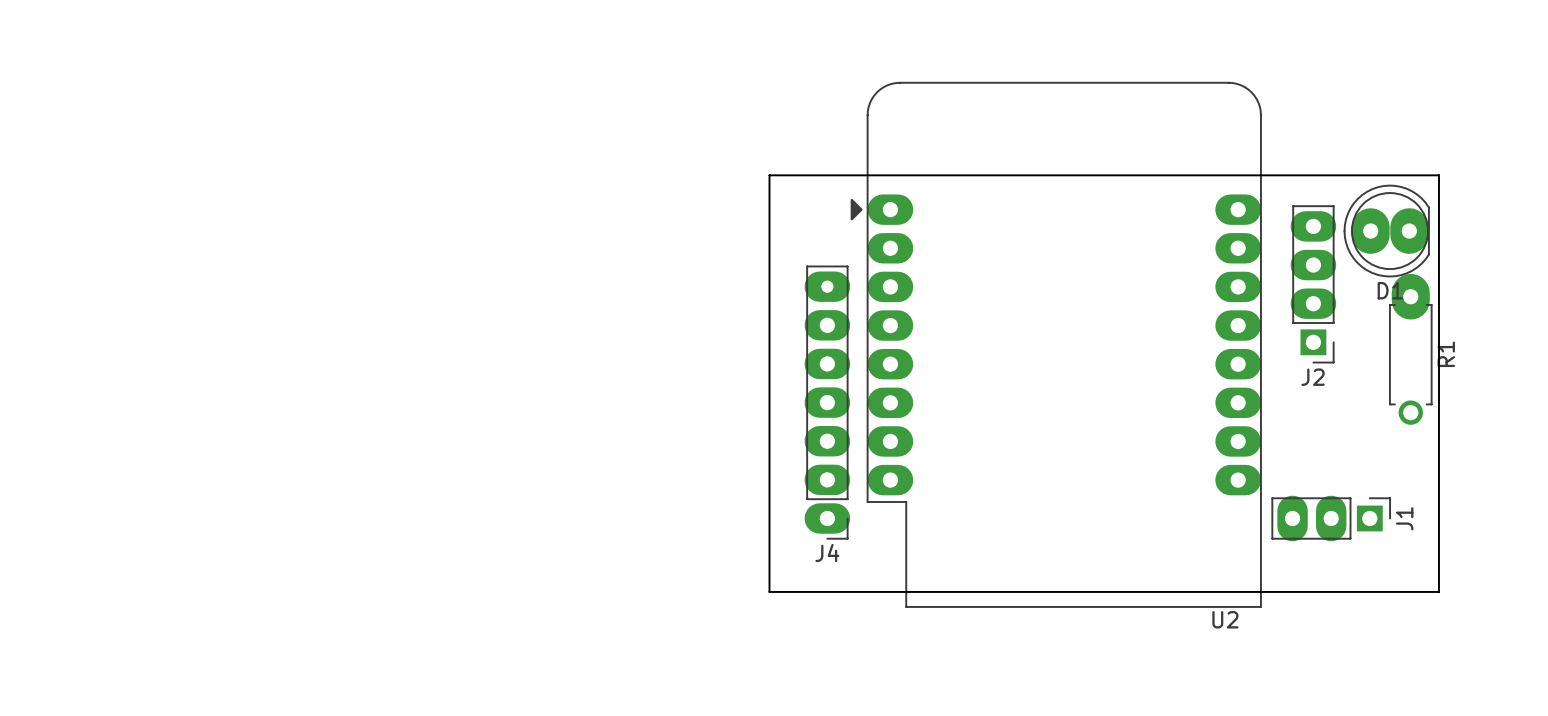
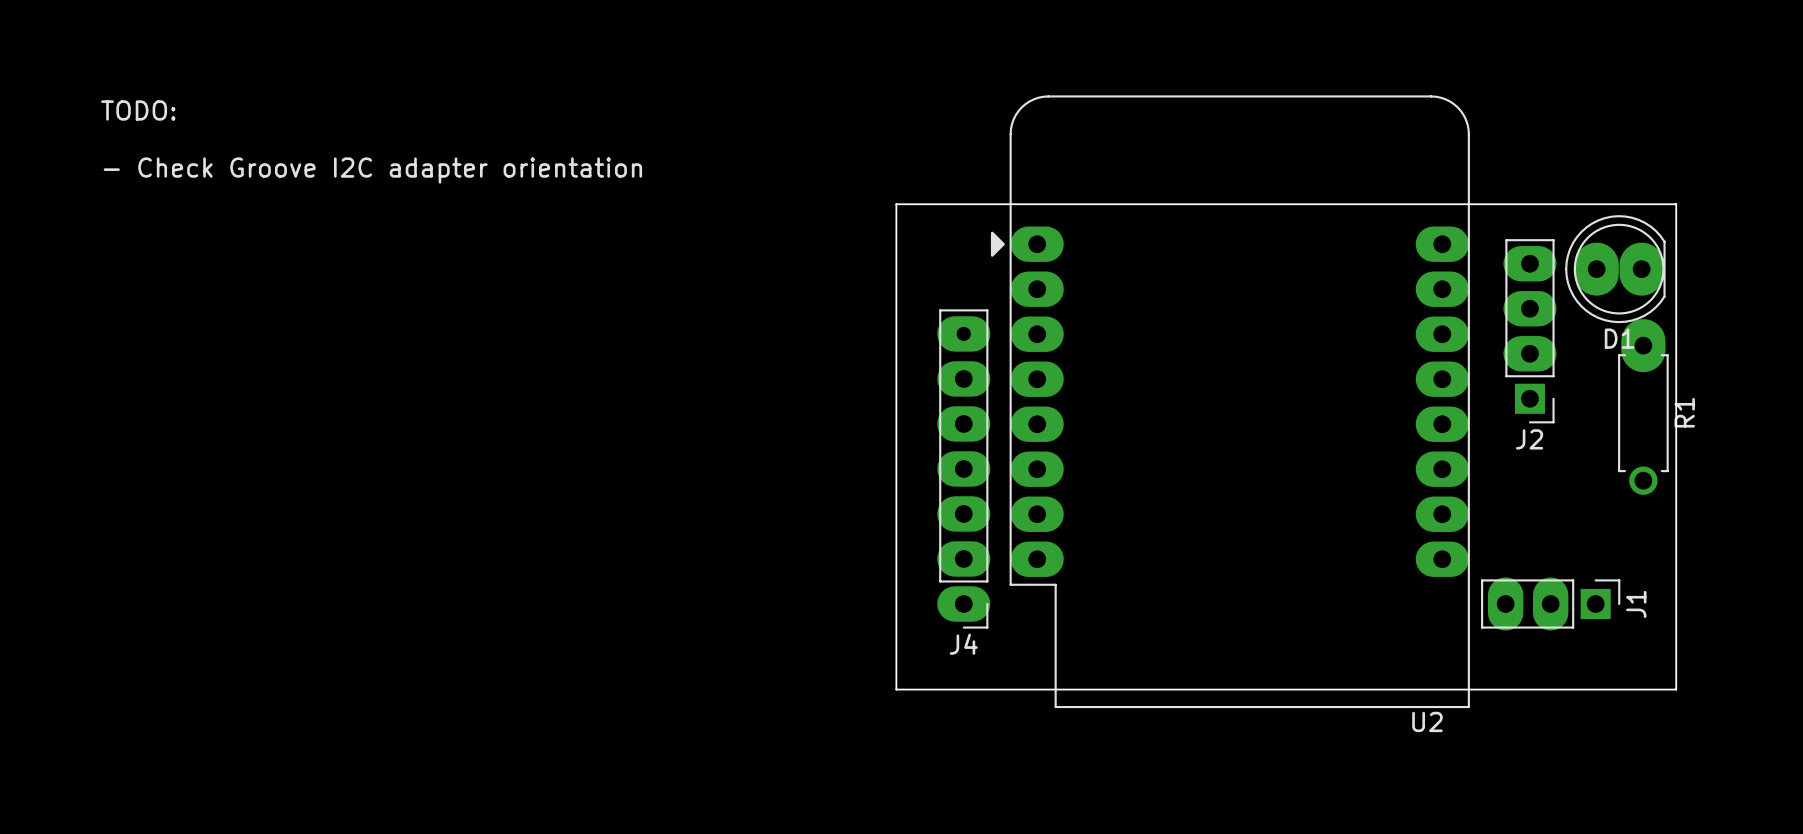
text: none -> TODO: (138, 110)
text: none -> - Check Groove I2C adapter orientation (372, 170)

